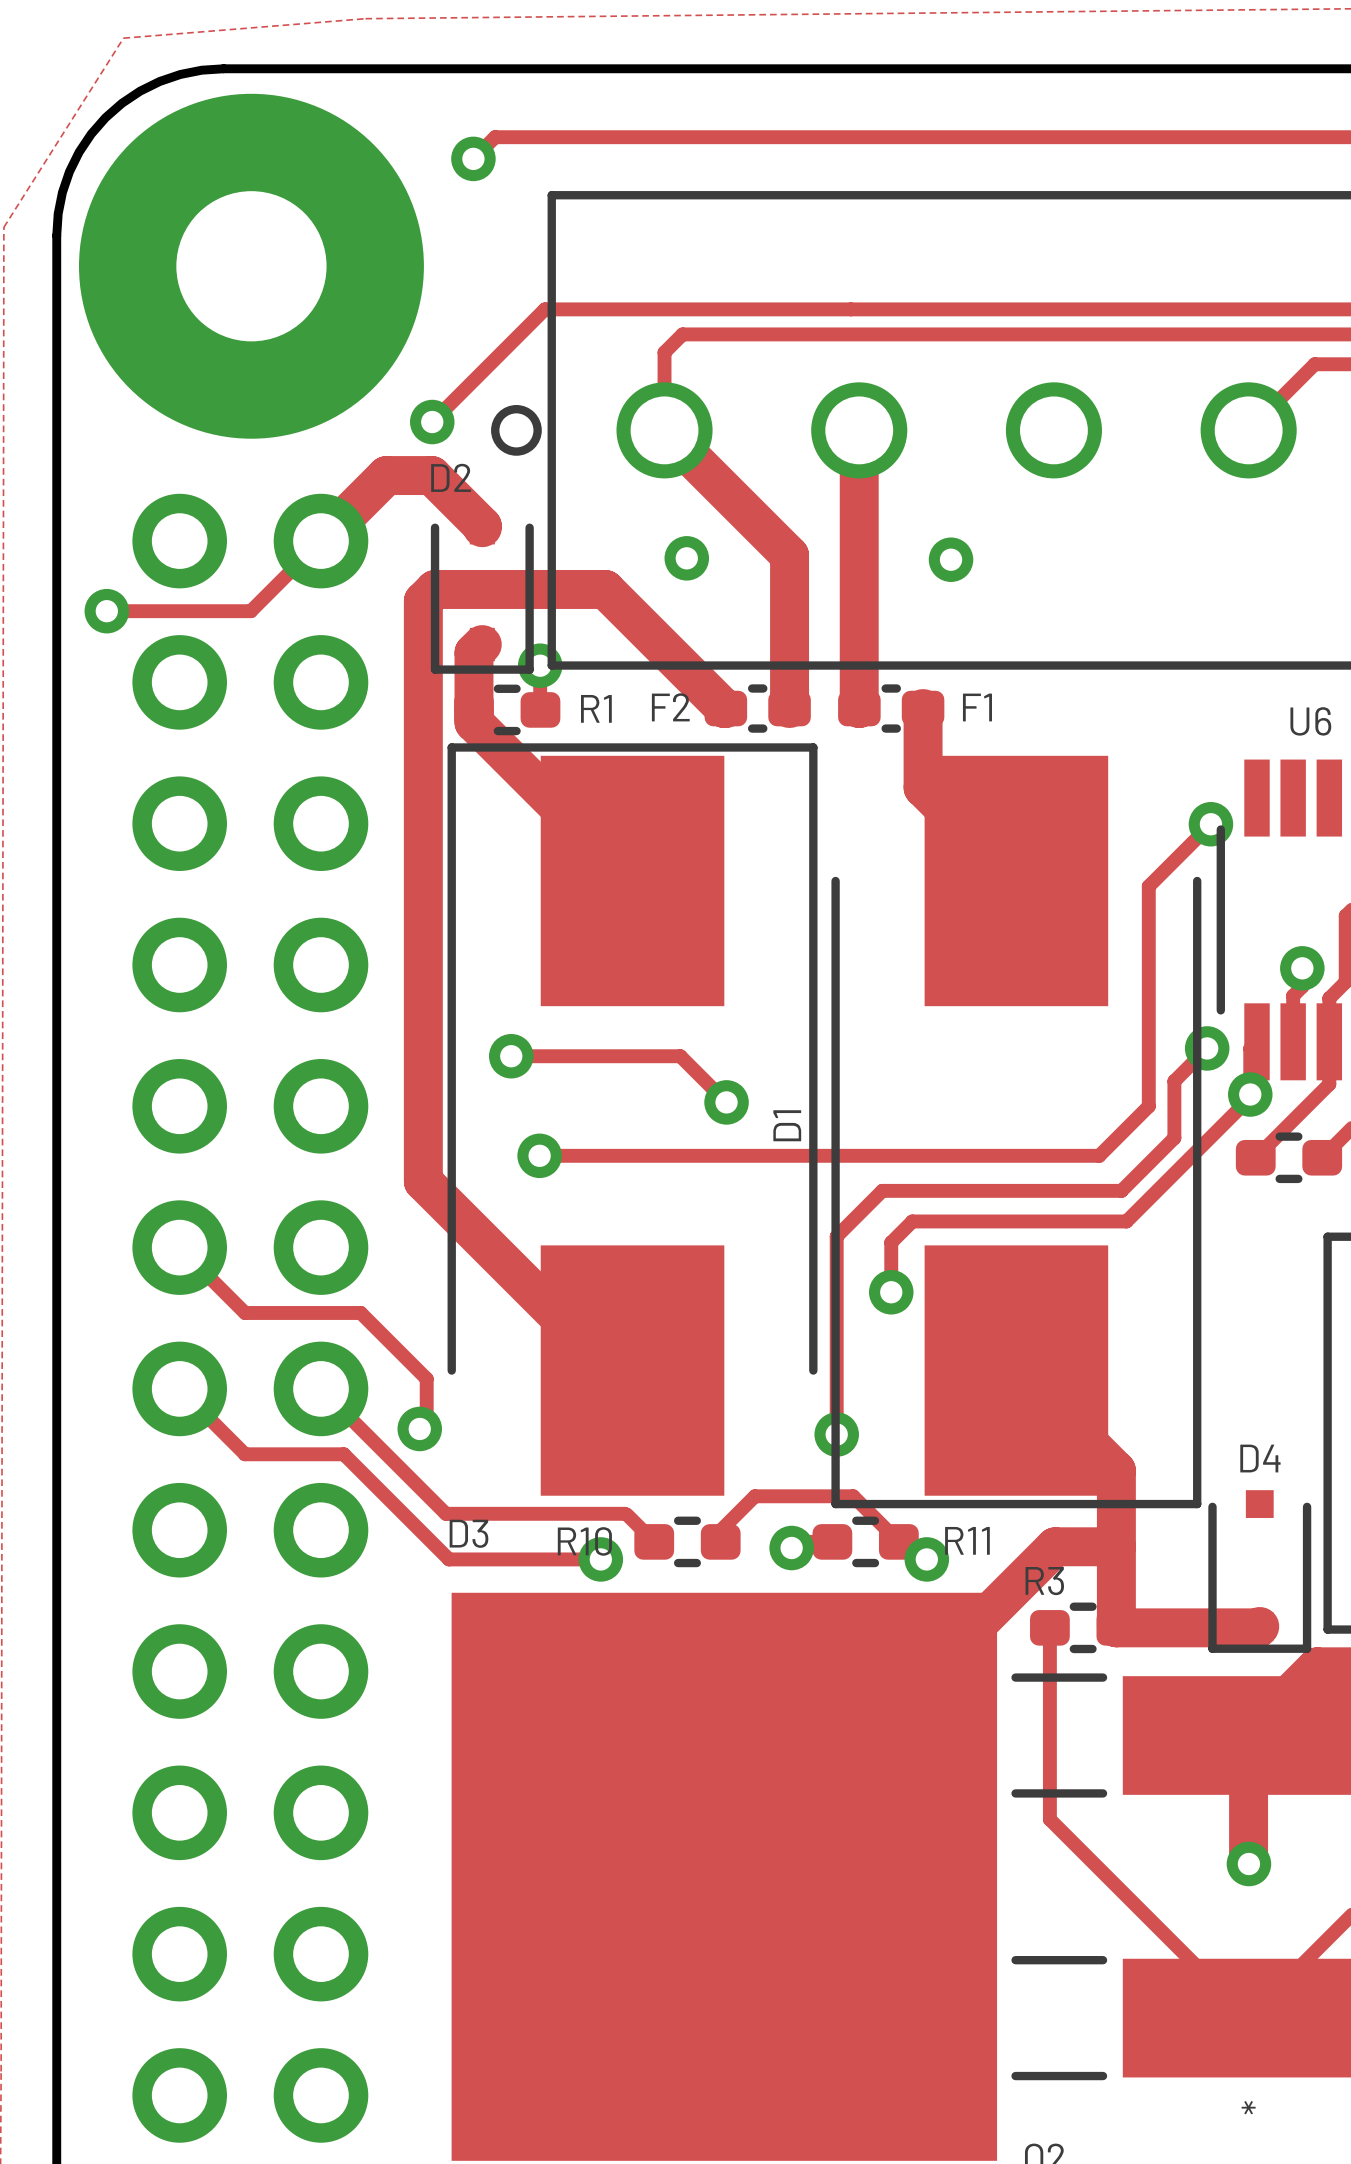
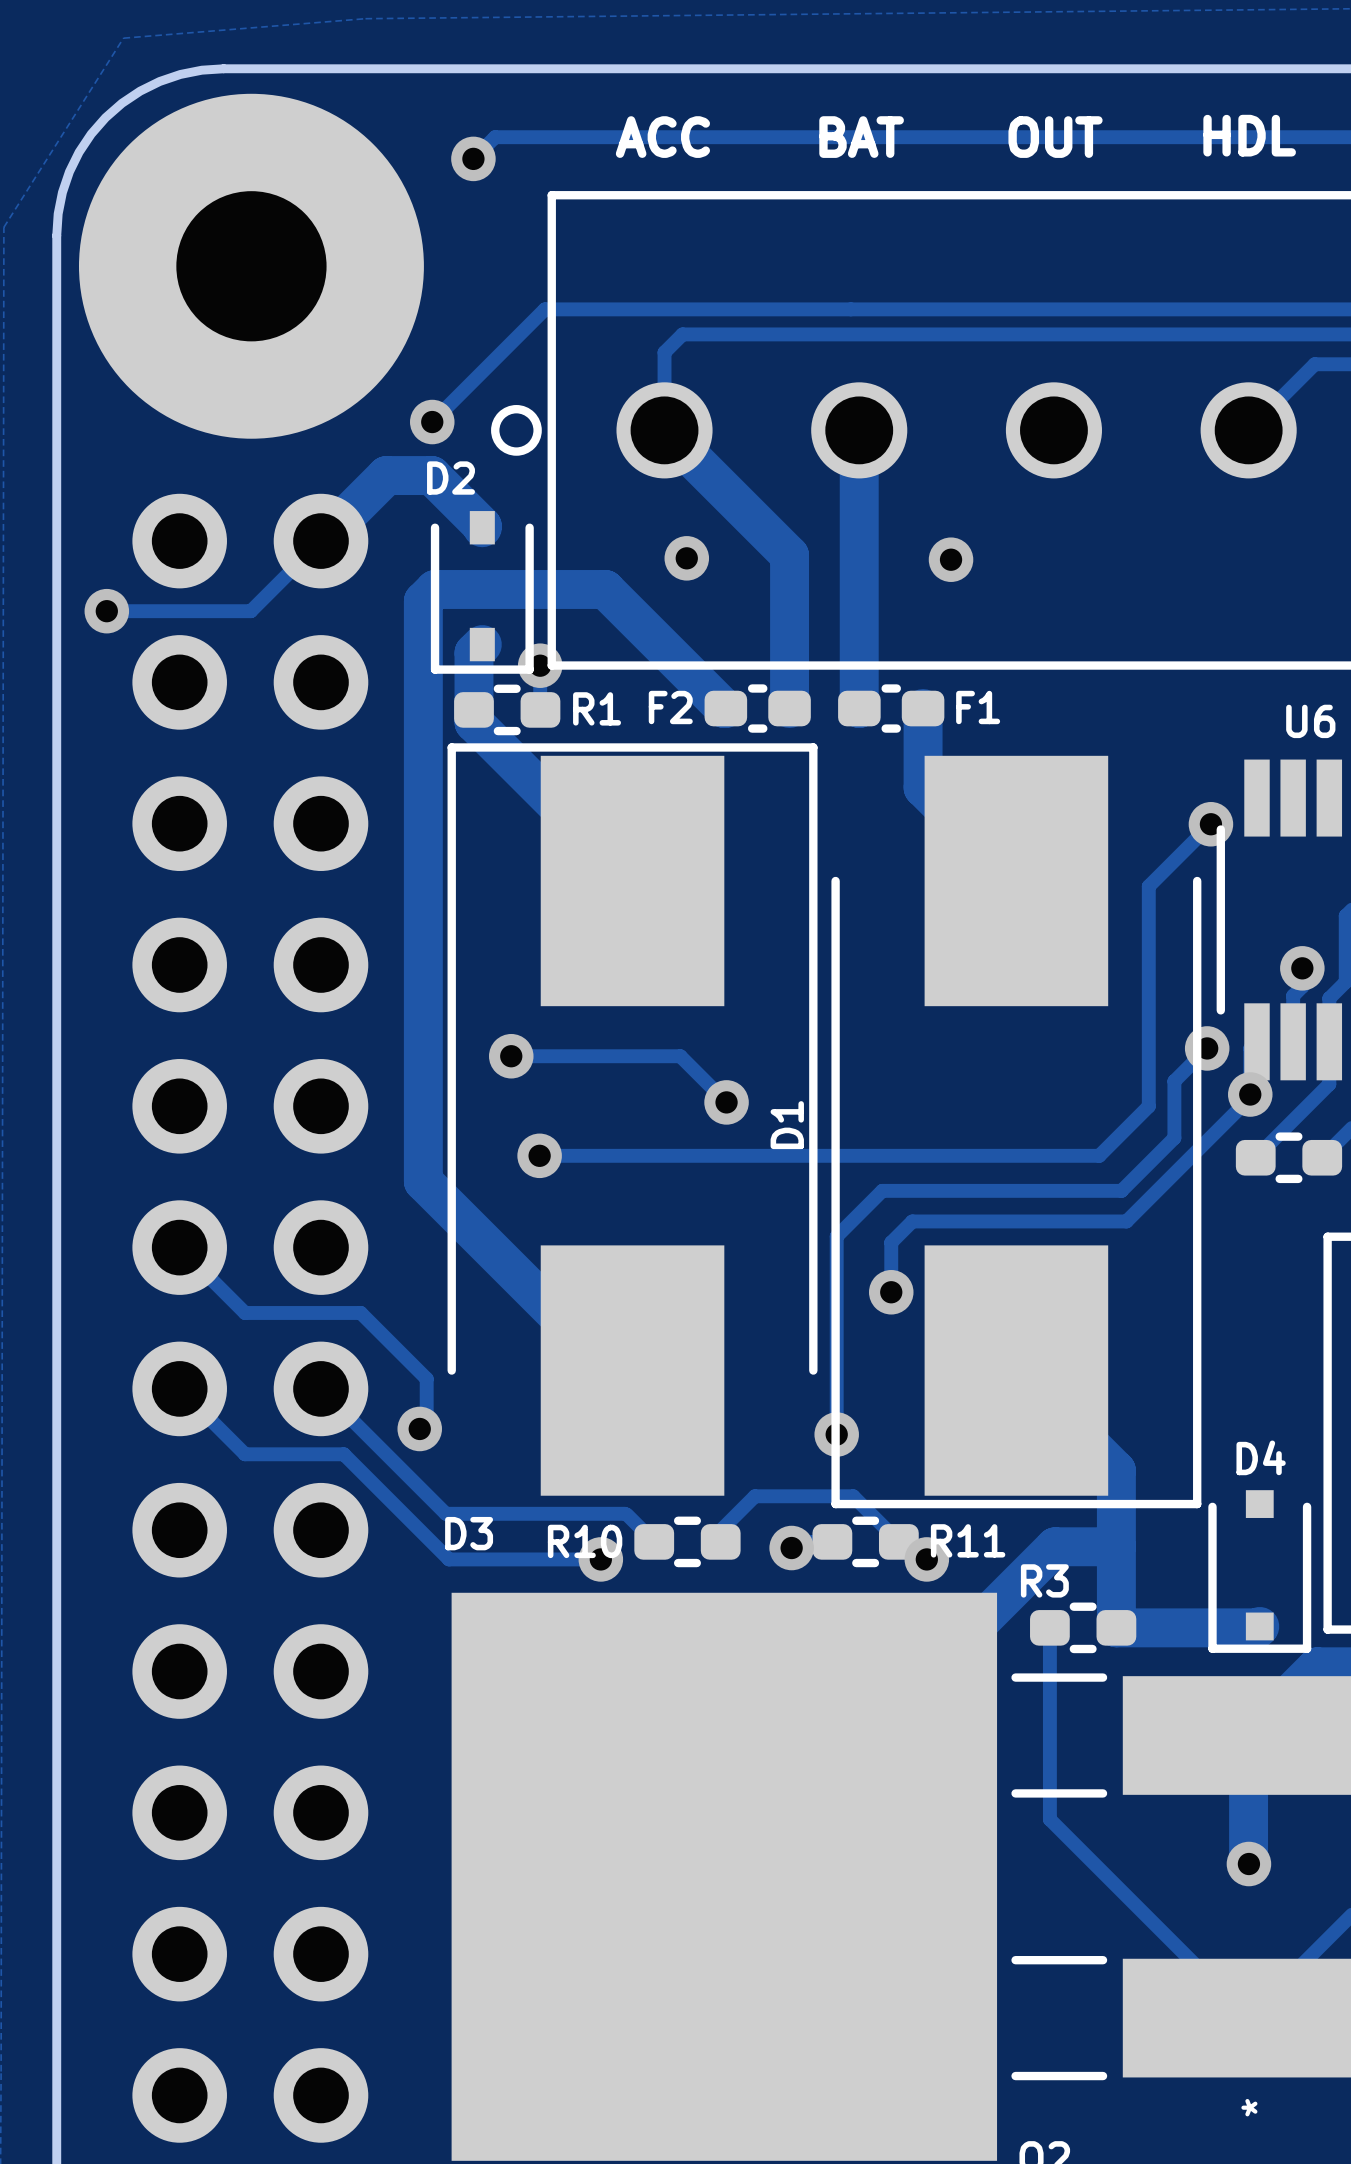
text: none -> HDL (1249, 135)
text: none -> ACC (662, 137)
text: none -> BAT (861, 137)
text: none -> OUT (1055, 137)

